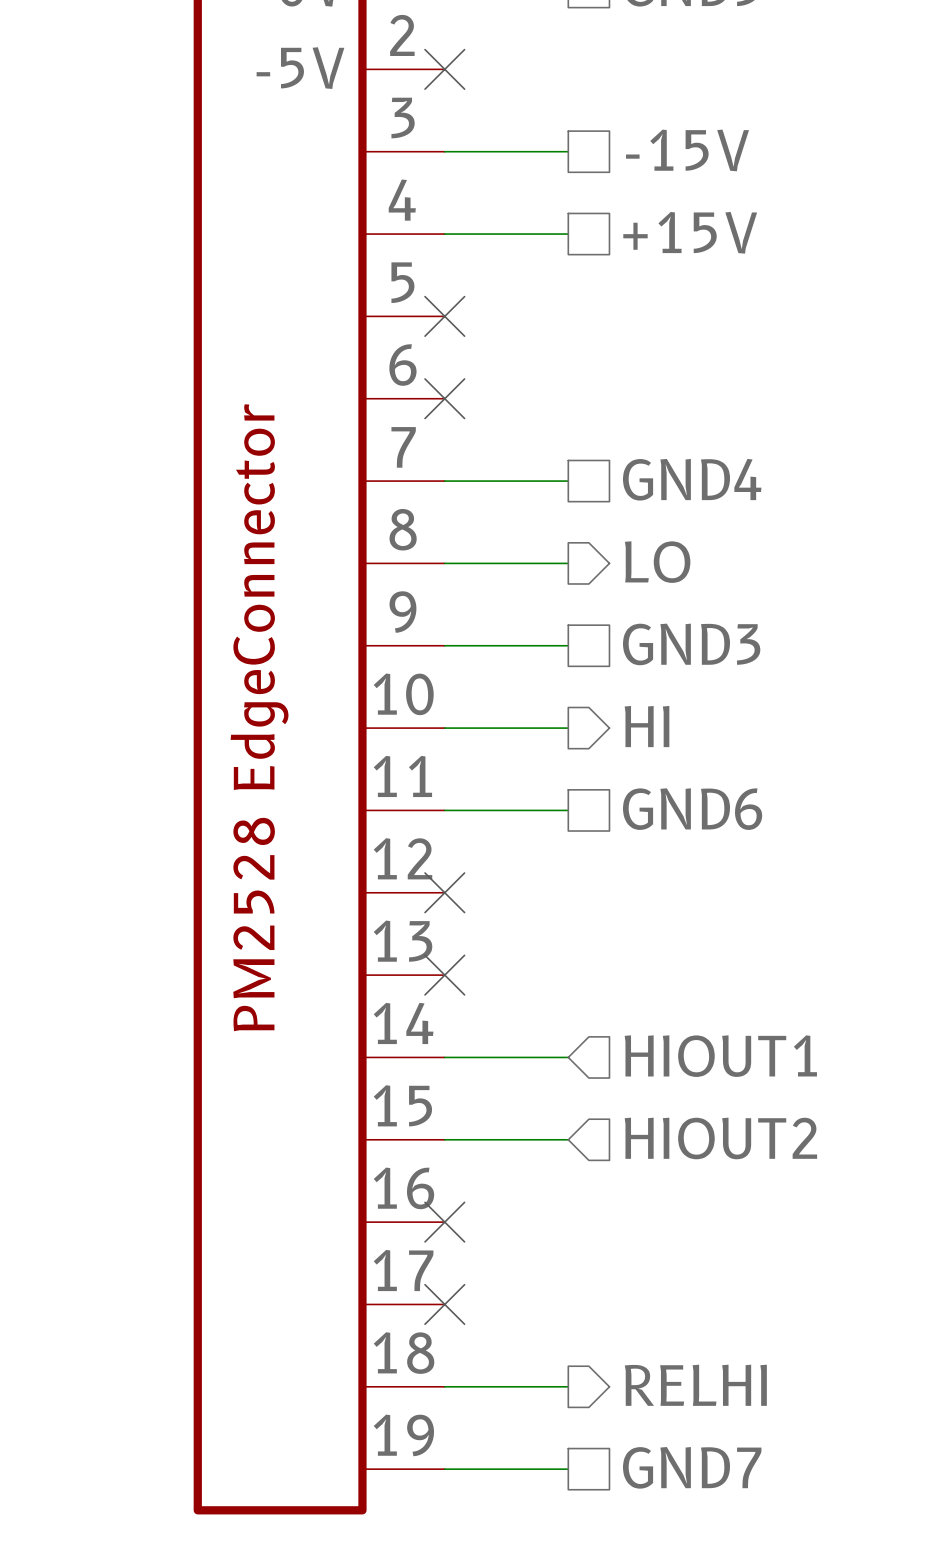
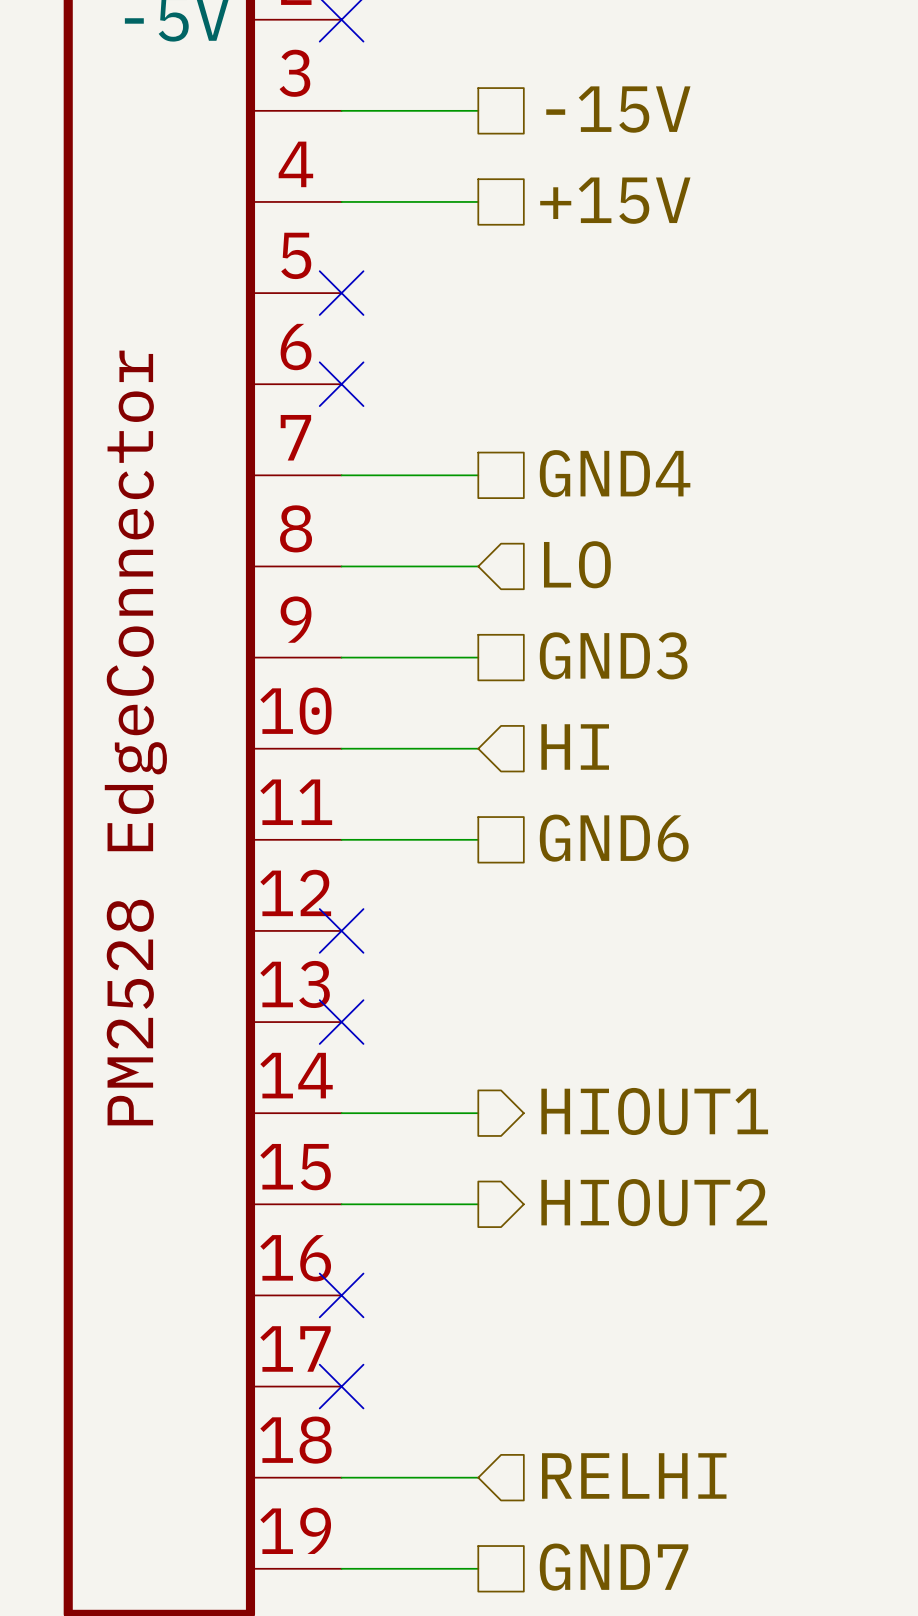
hierarchical label shape: output (657, 562) -> input (577, 564)
hierarchical label shape: output (647, 726) -> input (575, 747)
hierarchical label shape: input (720, 1056) -> output (654, 1111)
hierarchical label shape: input (720, 1138) -> output (654, 1202)
hierarchical label shape: output (695, 1385) -> input (634, 1475)

